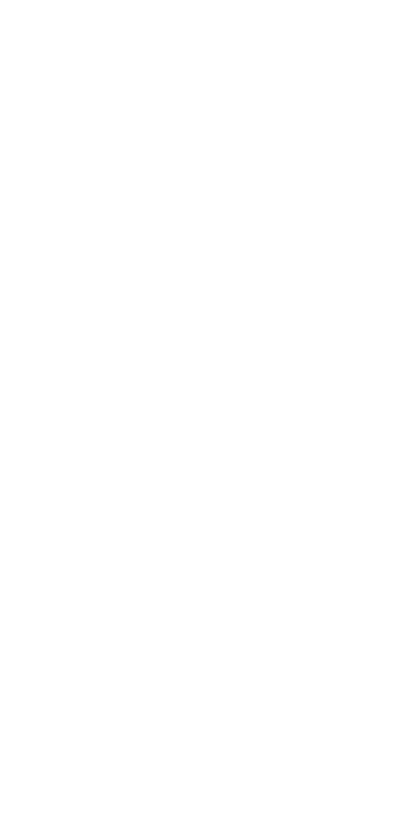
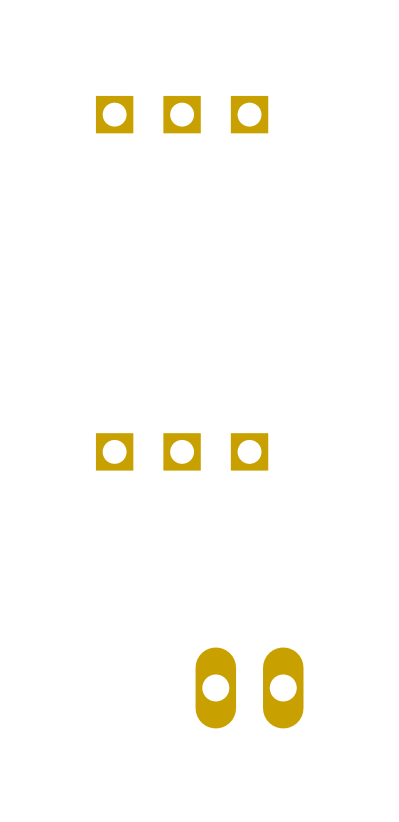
part: none -> (182, 114)
part: none -> (182, 451)
part: none -> (249, 687)

